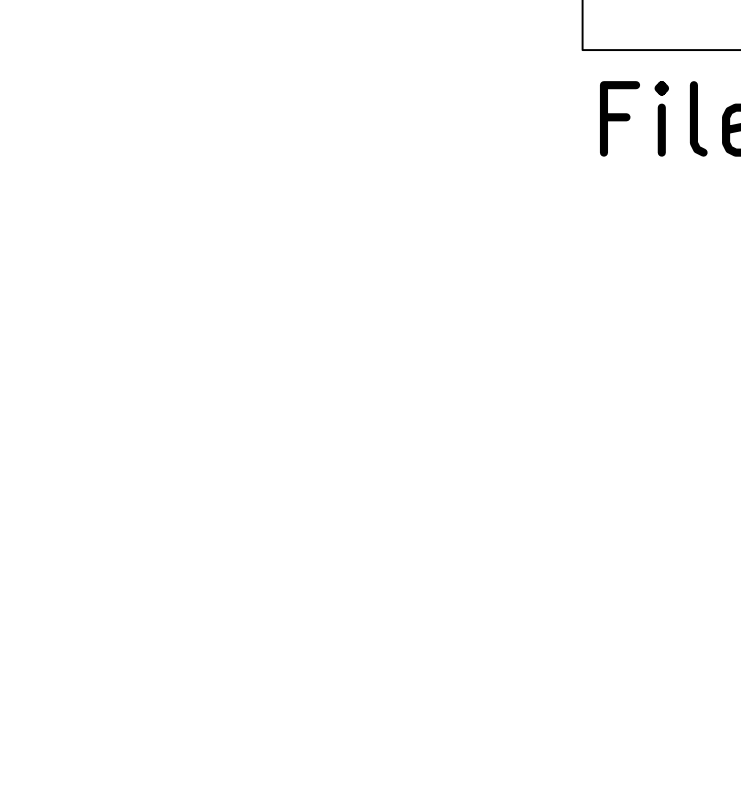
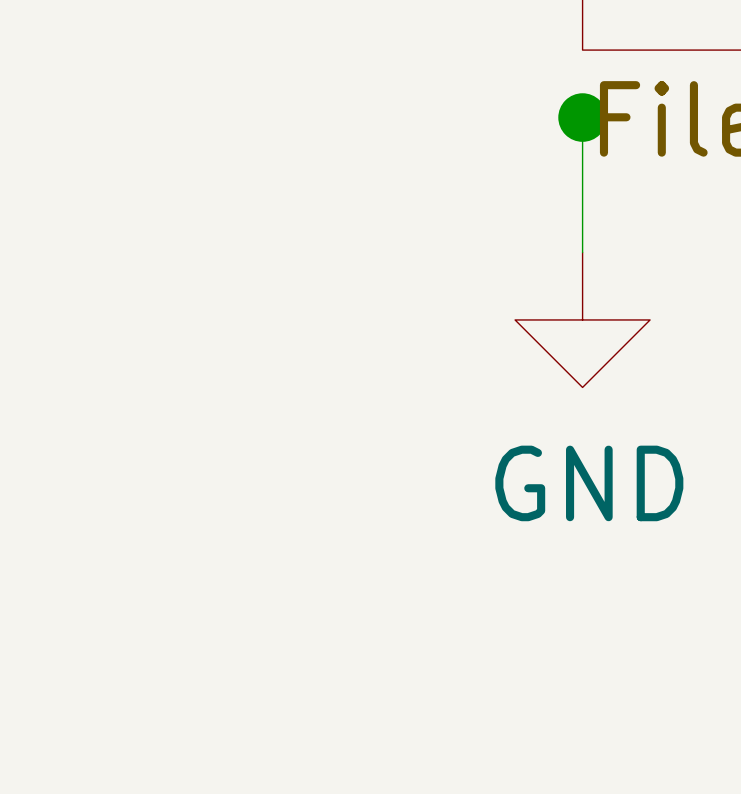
wire: none -> (582, 117) (582, 252)
junction: none -> (582, 117)
power symbol: none -> GND (582, 319)

